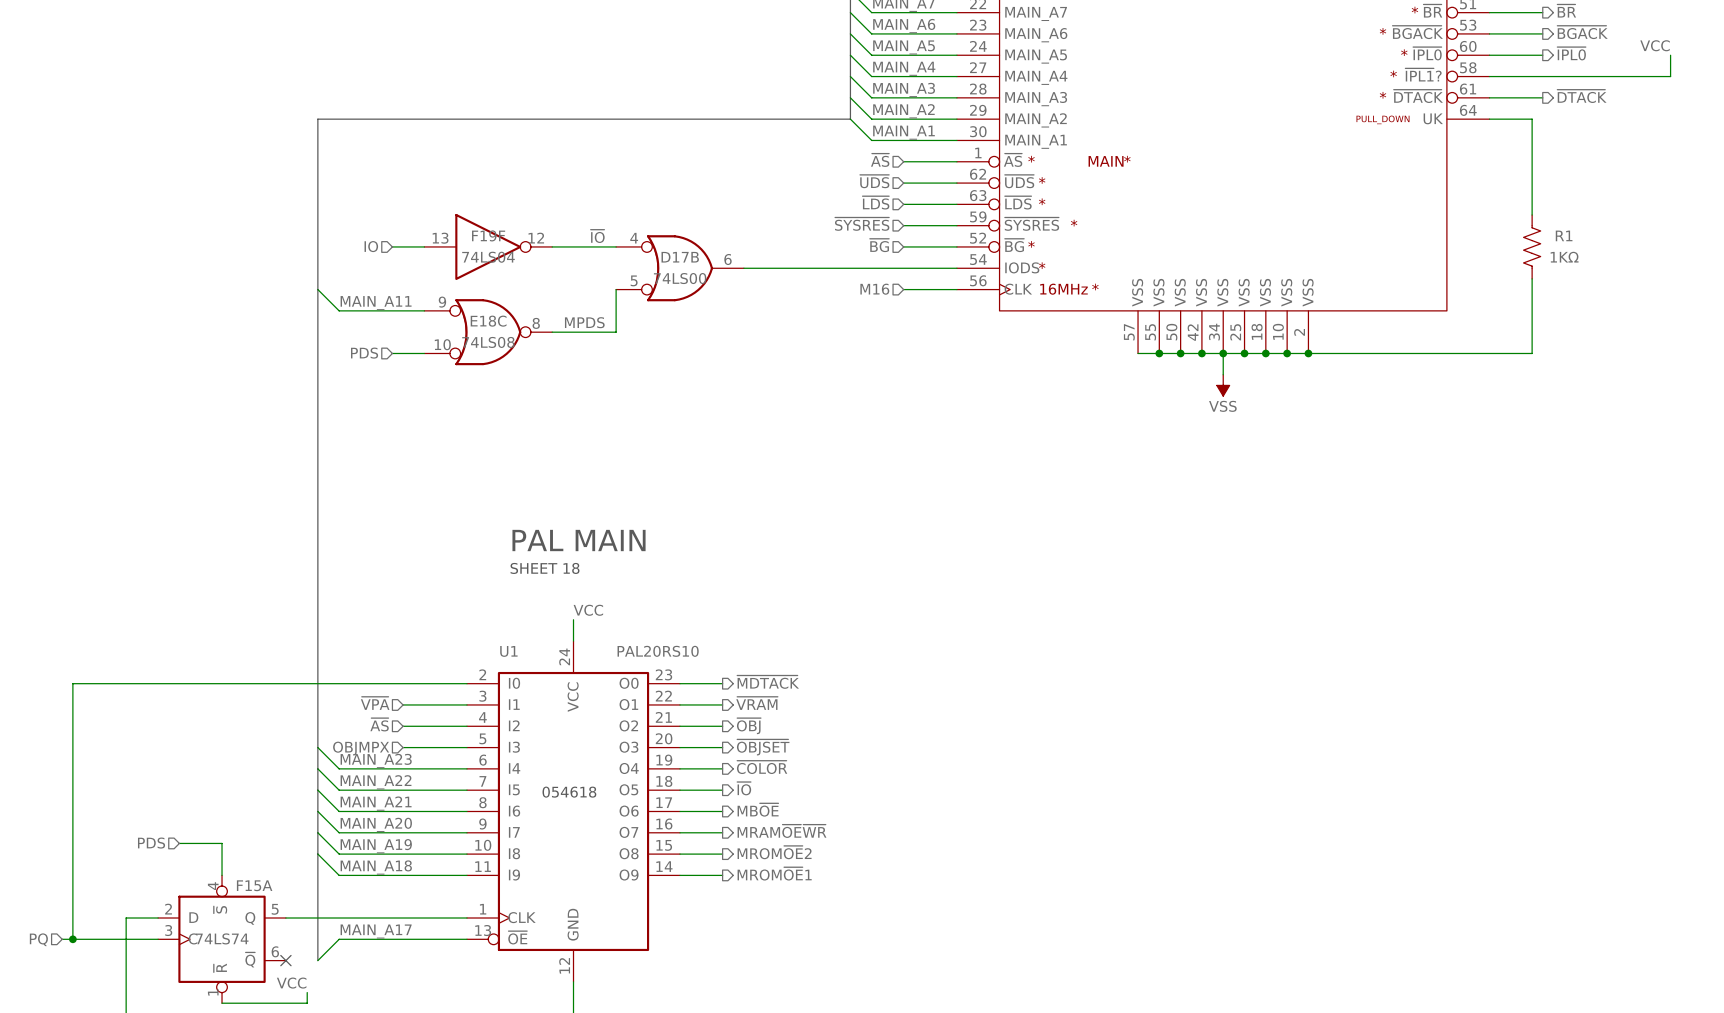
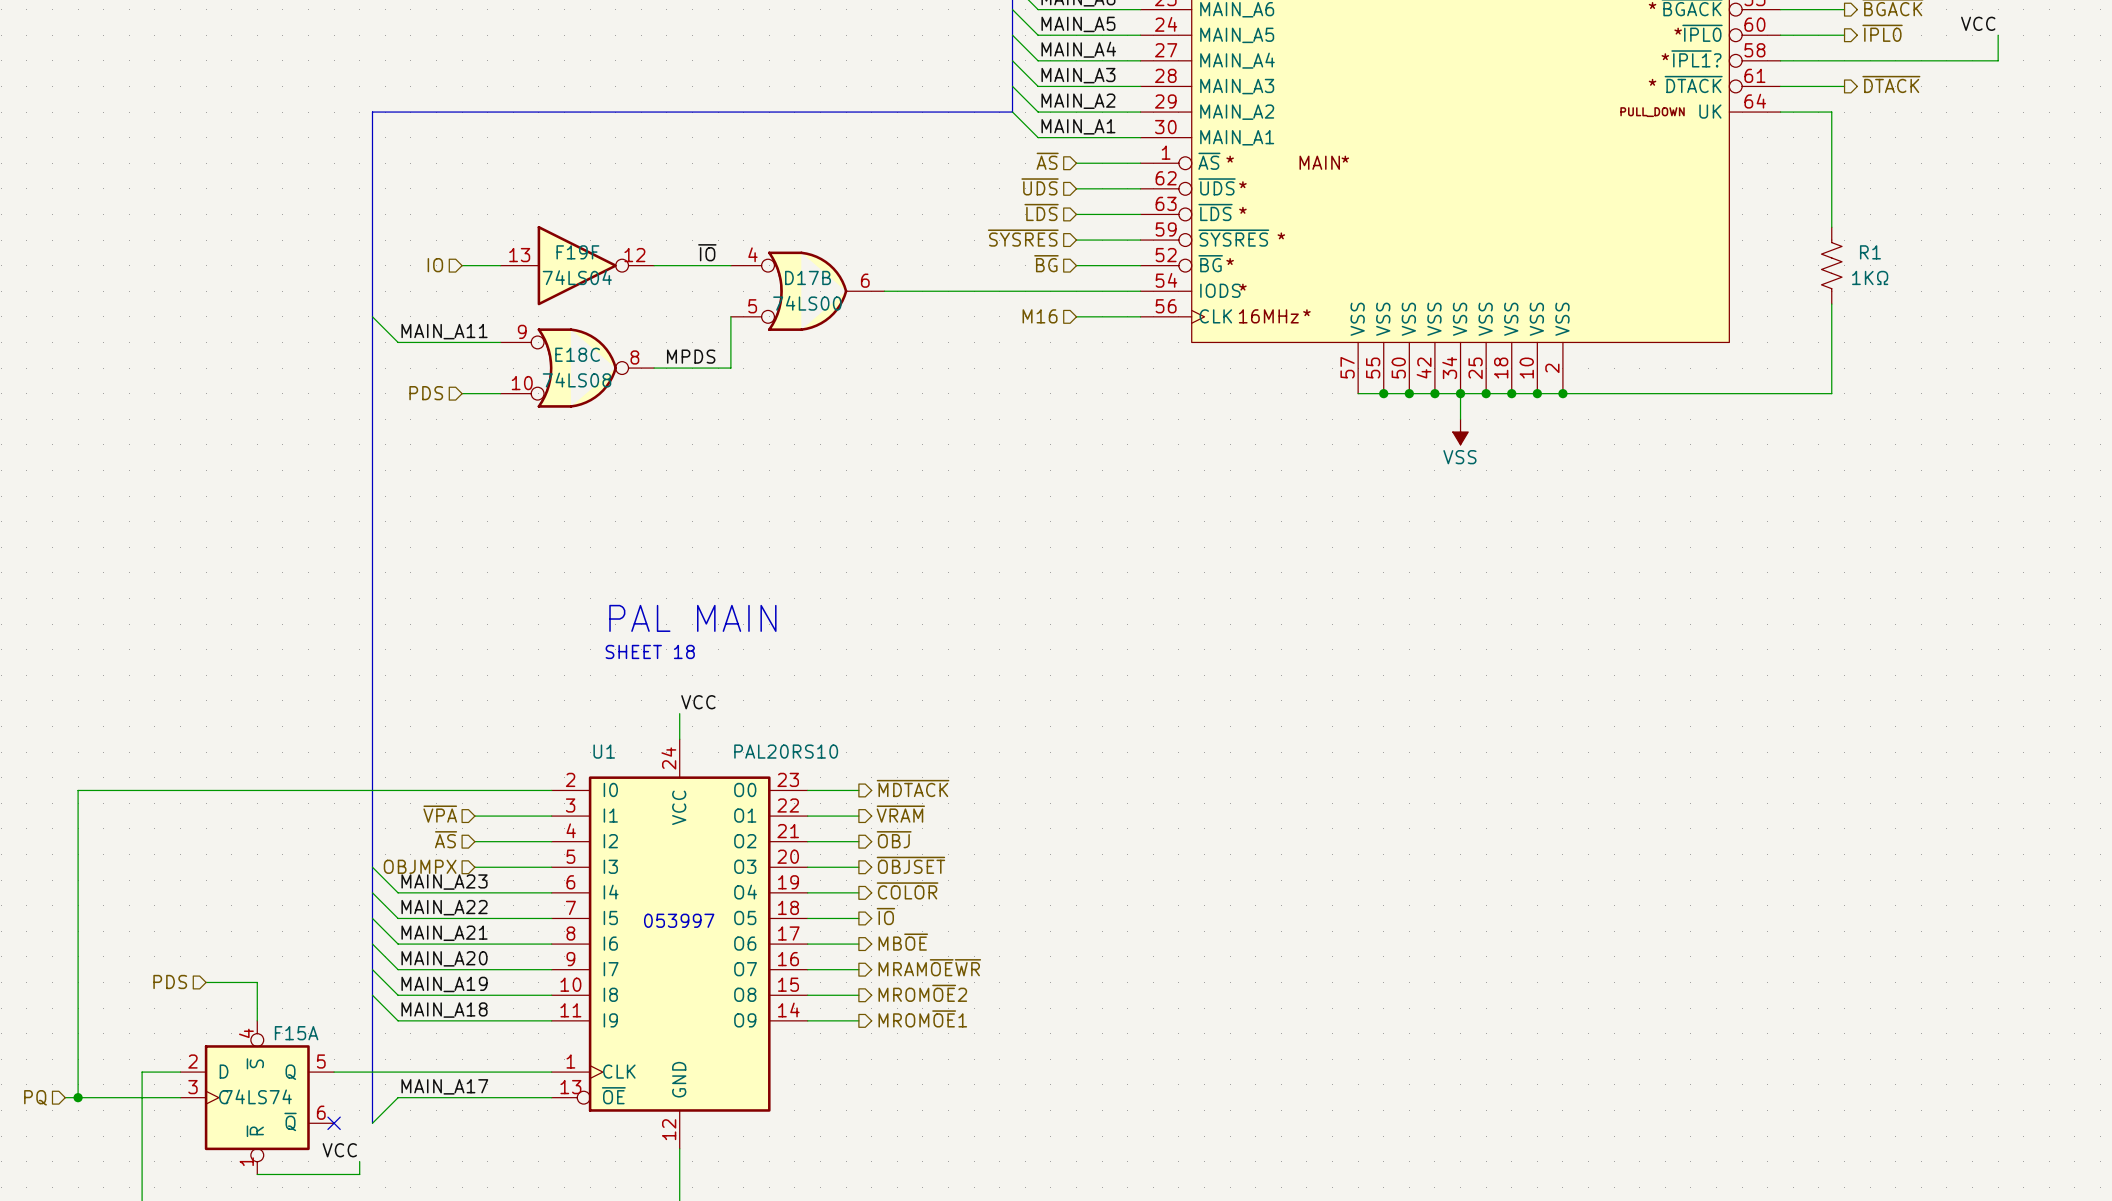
text: 054618 (569, 792) -> 053997 (679, 920)

